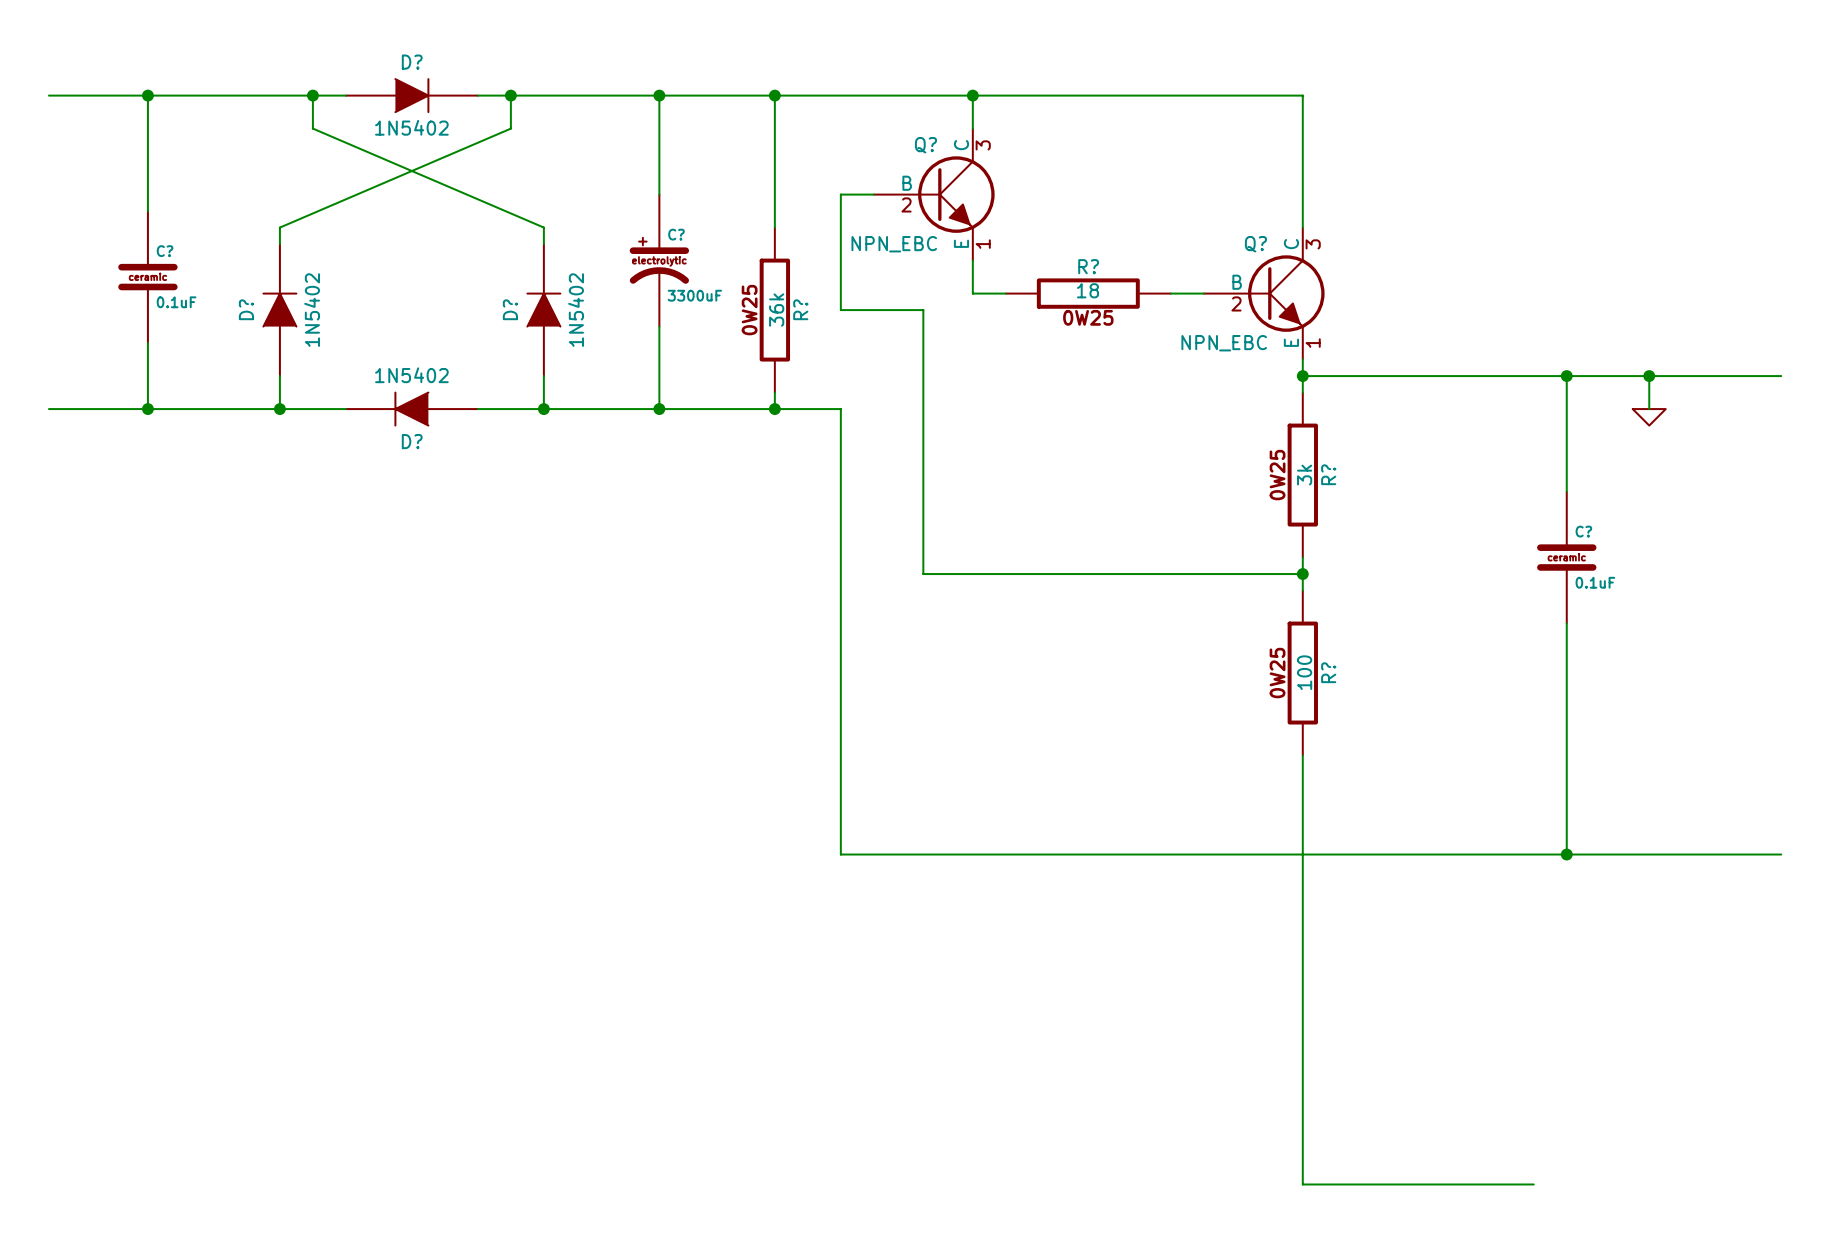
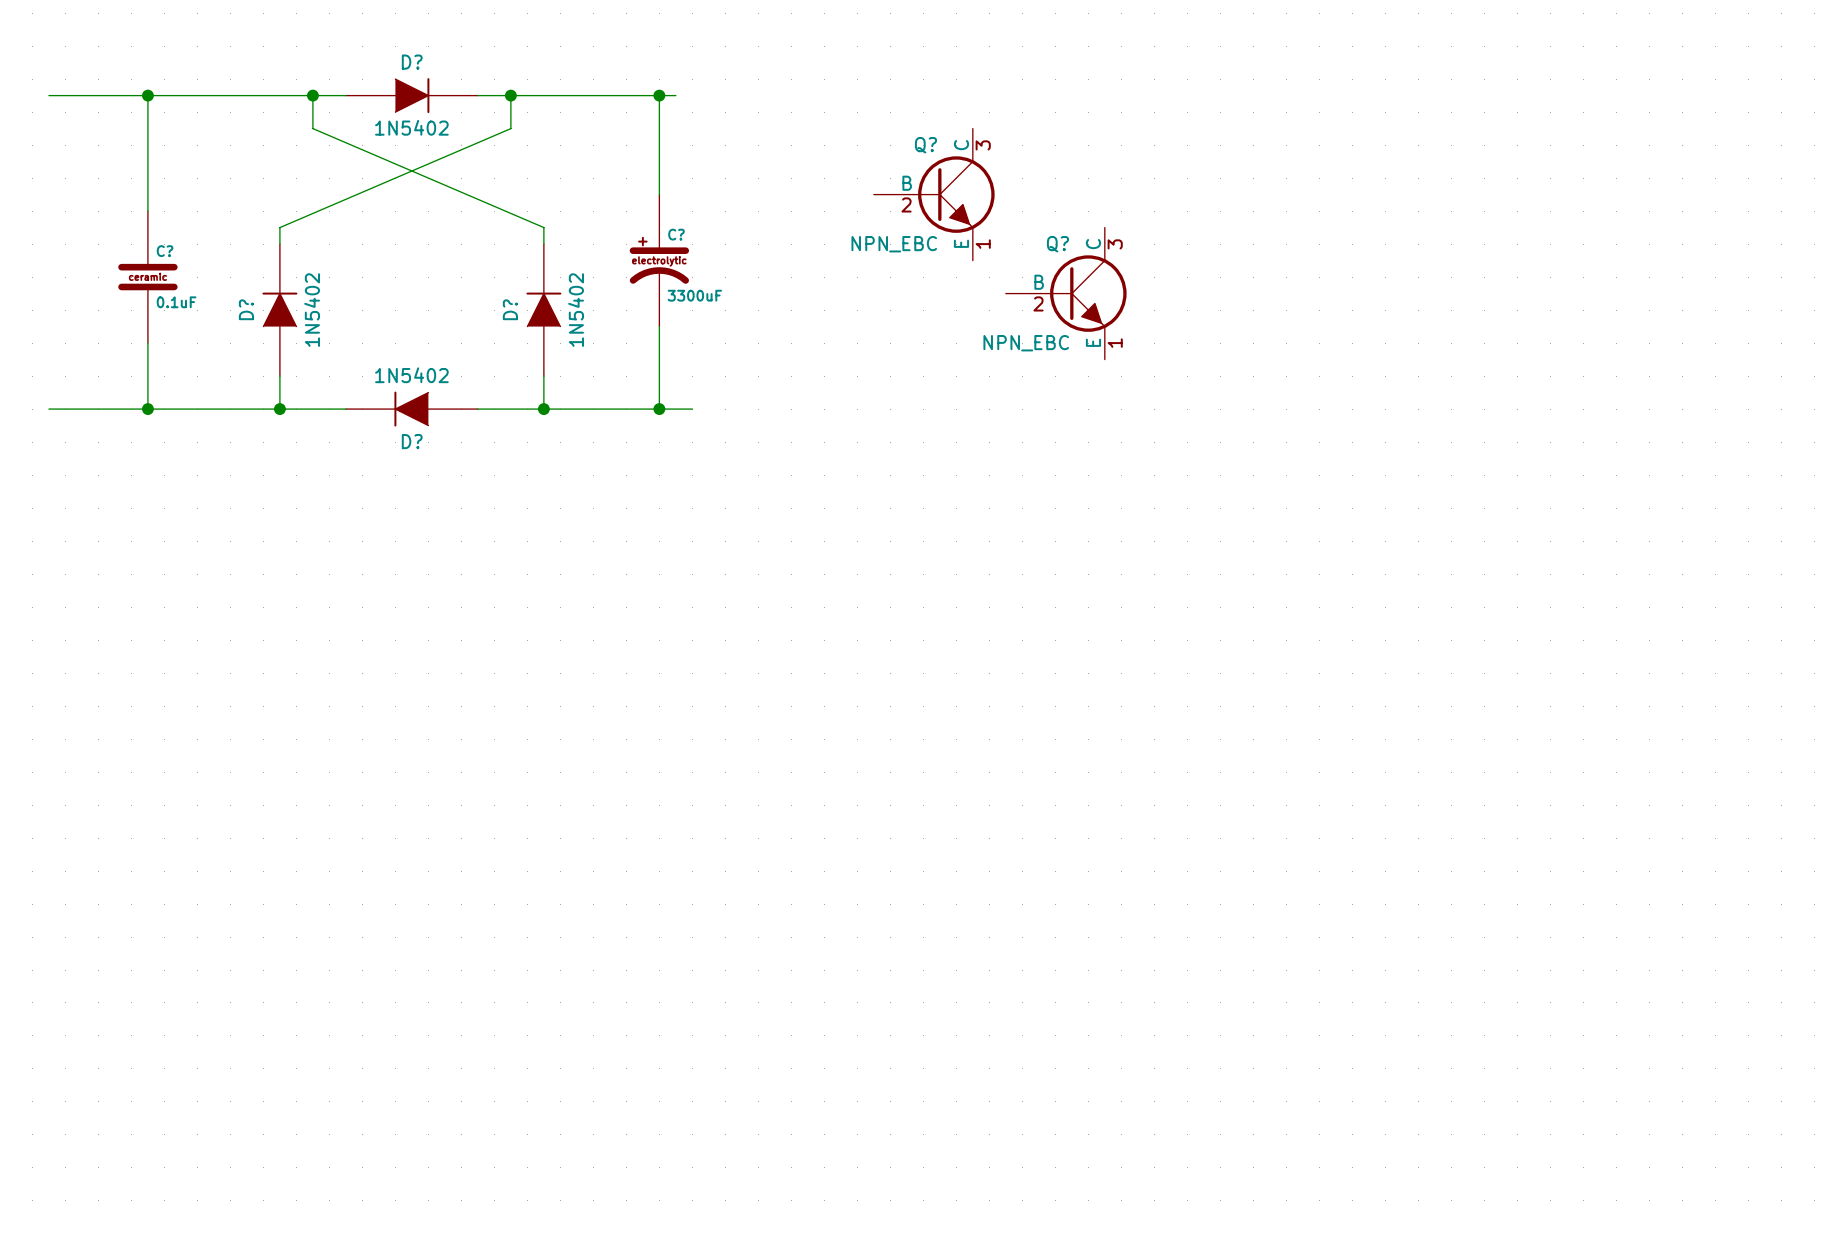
wire: (675, 95) (1302, 95) (1302, 227) -> none
wire: (774, 95) (774, 227) -> none
junction: (774, 95) -> none
wire: (972, 95) (972, 128) -> none
junction: (972, 95) -> none
wire: (873, 194) (840, 194) (840, 310) (923, 310) (923, 574) (1302, 574) -> none
wire: (972, 260) (972, 293) (1005, 293) -> none
R?: 18 (1088, 293) -> none
wire: (1170, 293) (1203, 293) -> none
Q? position: (1264, 293) -> (1066, 293)
R?: 36k (774, 310) -> none
wire: (1302, 359) (1302, 392) -> none
wire: (1302, 376) (1781, 376) -> none
junction: (1302, 376) -> none
wire: (1566, 376) (1566, 491) -> none
junction: (1566, 376) -> none
wire: (1649, 376) (1649, 409) -> none
junction: (1649, 376) -> none
wire: (774, 392) (774, 409) -> none
wire: (692, 409) (840, 409) (840, 854) (1781, 854) -> none
junction: (774, 409) -> none
power symbol: (1649, 417) -> none
R?: 3k (1302, 475) -> none
wire: (1302, 557) (1302, 590) -> none
C?: 0.1uF (1566, 557) -> none
junction: (1302, 574) -> none
wire: (1566, 623) (1566, 854) -> none
R?: 100 (1302, 673) -> none
wire: (1302, 755) (1302, 1184) (1533, 1184) -> none
junction: (1566, 854) -> none

